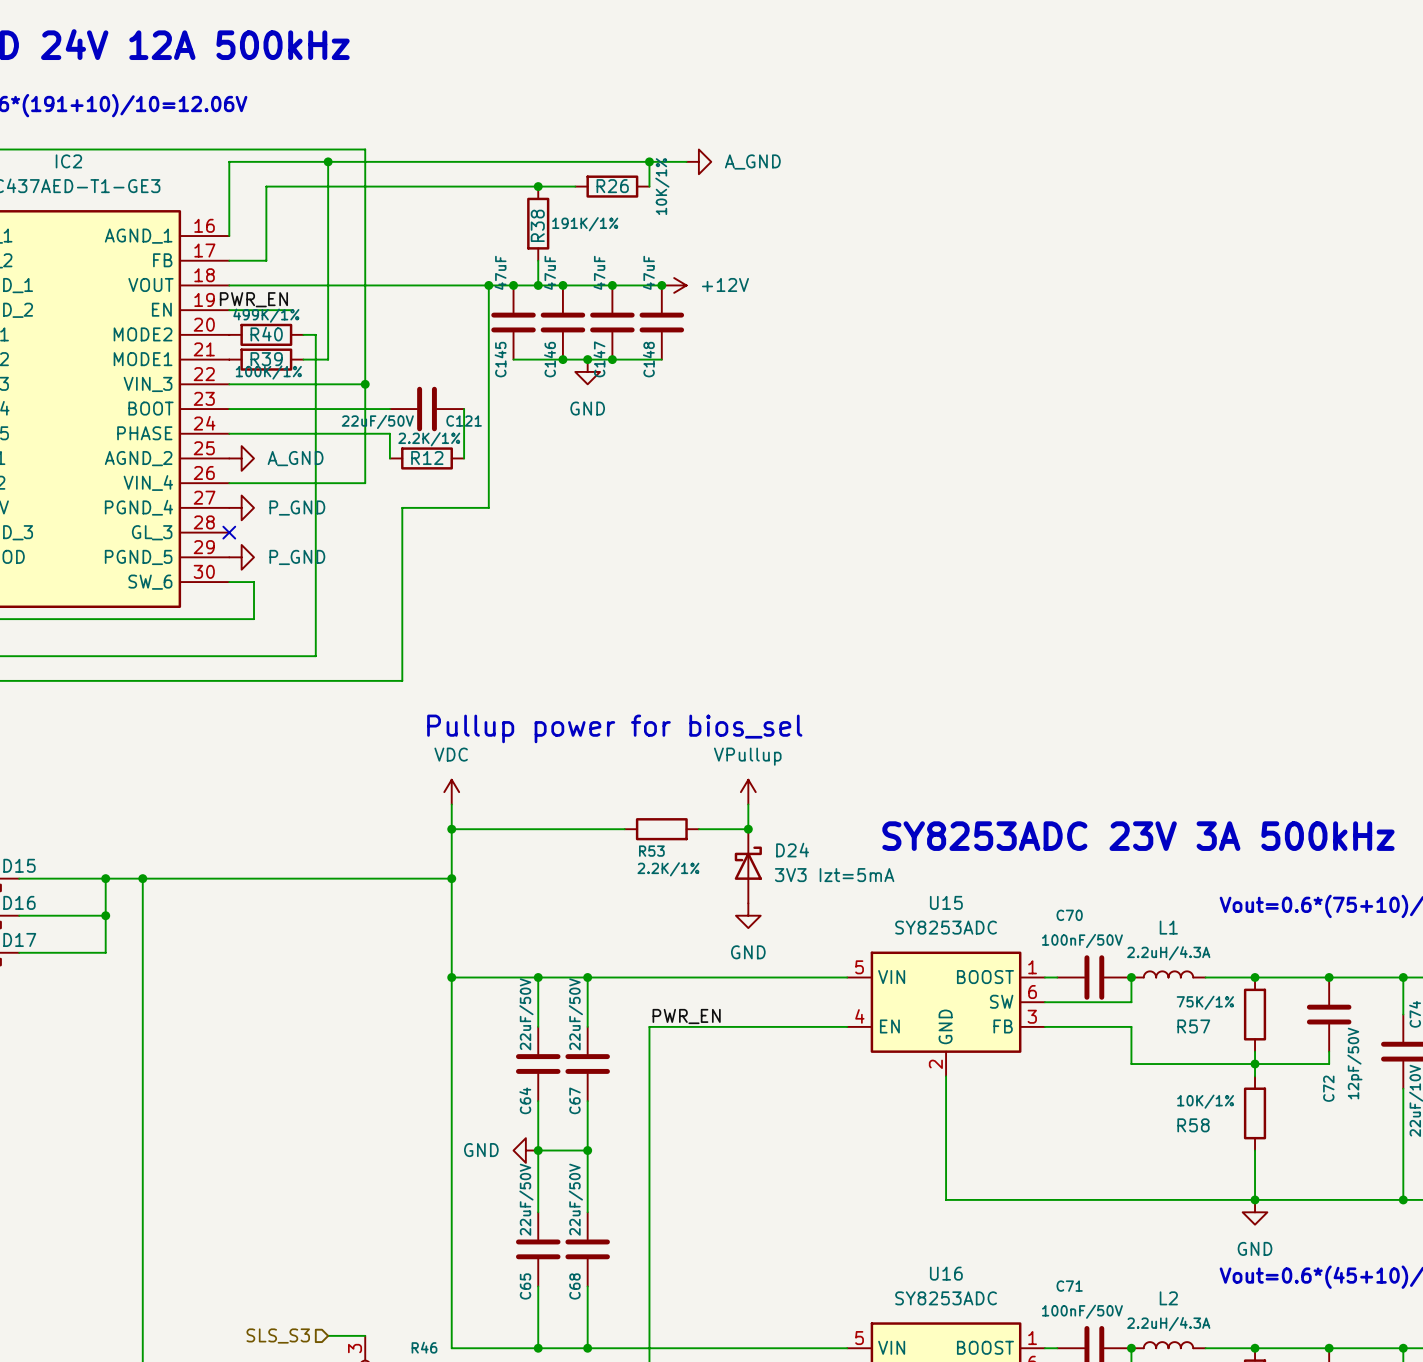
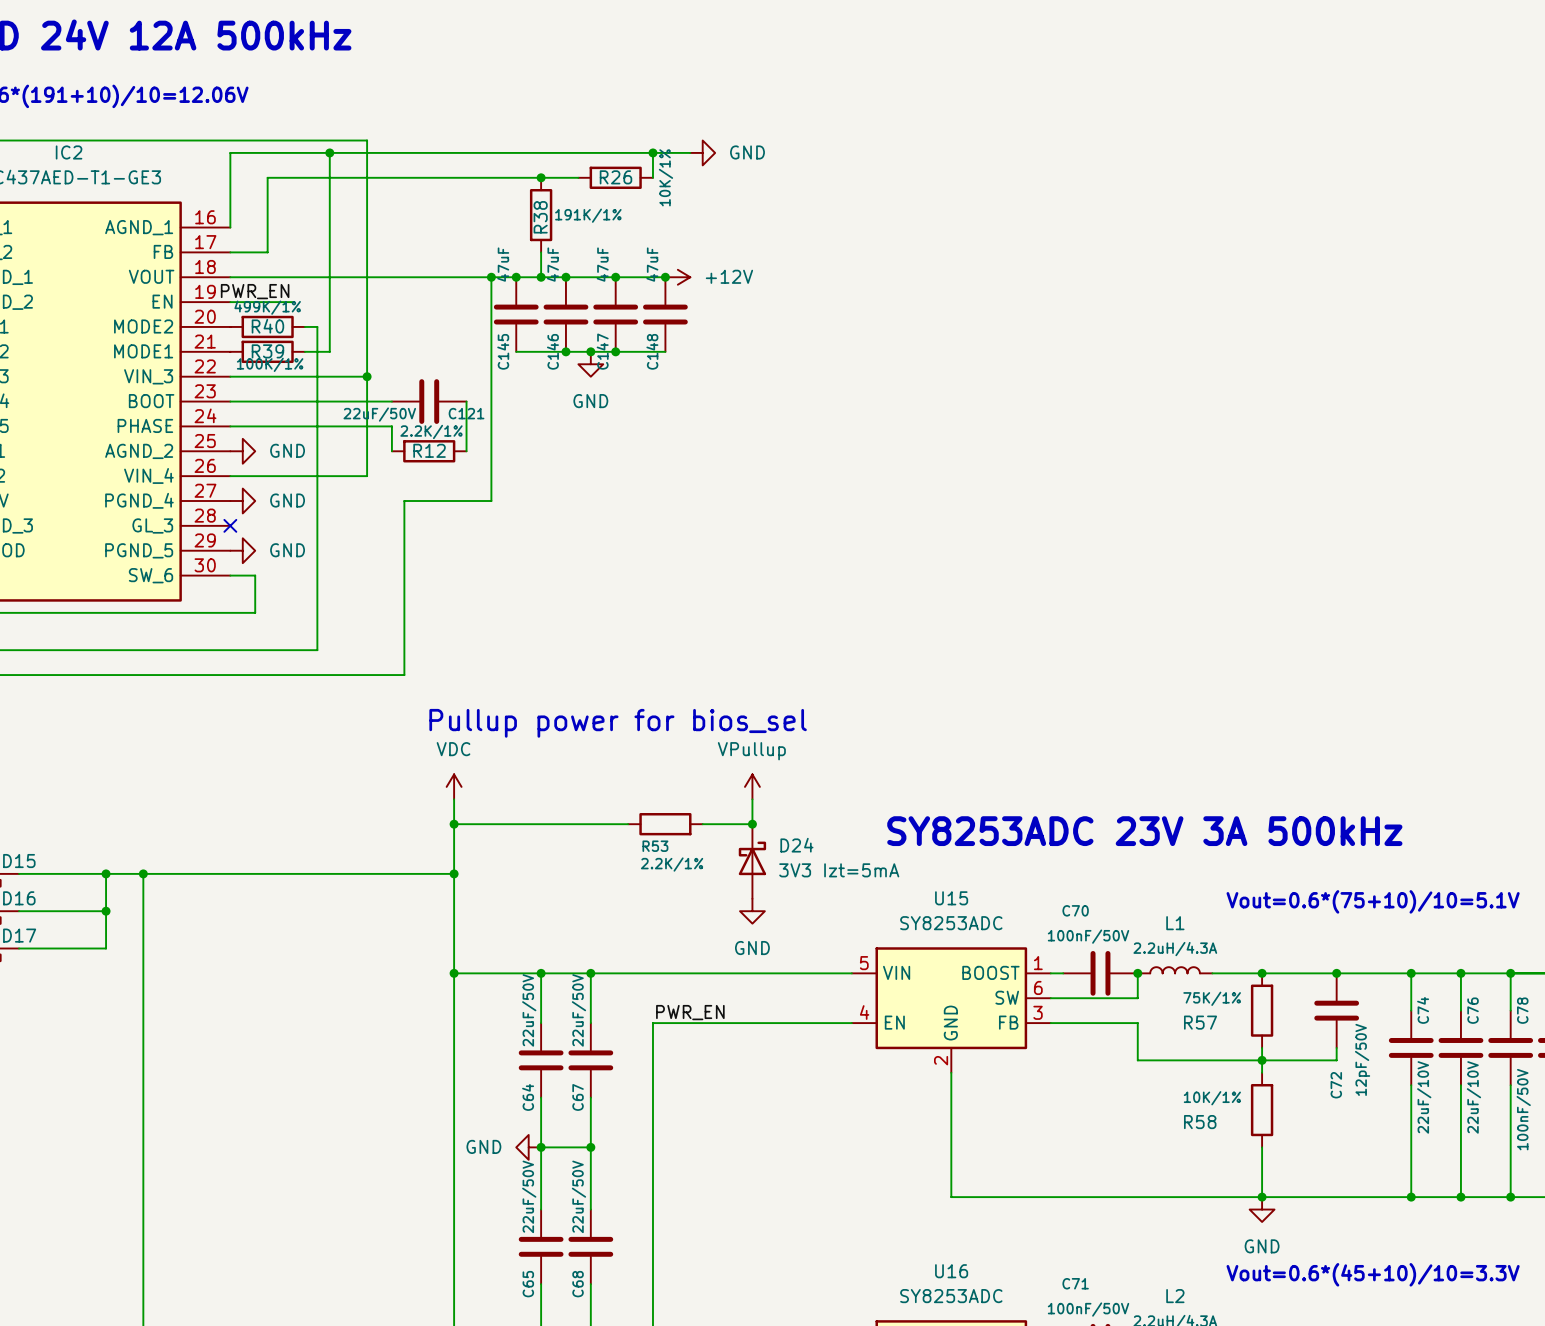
power symbol: A_GND (698, 161) -> GND (702, 152)
power symbol: A_GND (241, 458) -> GND (242, 451)
power symbol: P_GND (241, 507) -> GND (242, 501)
power symbol: P_GND (241, 557) -> GND (242, 550)

